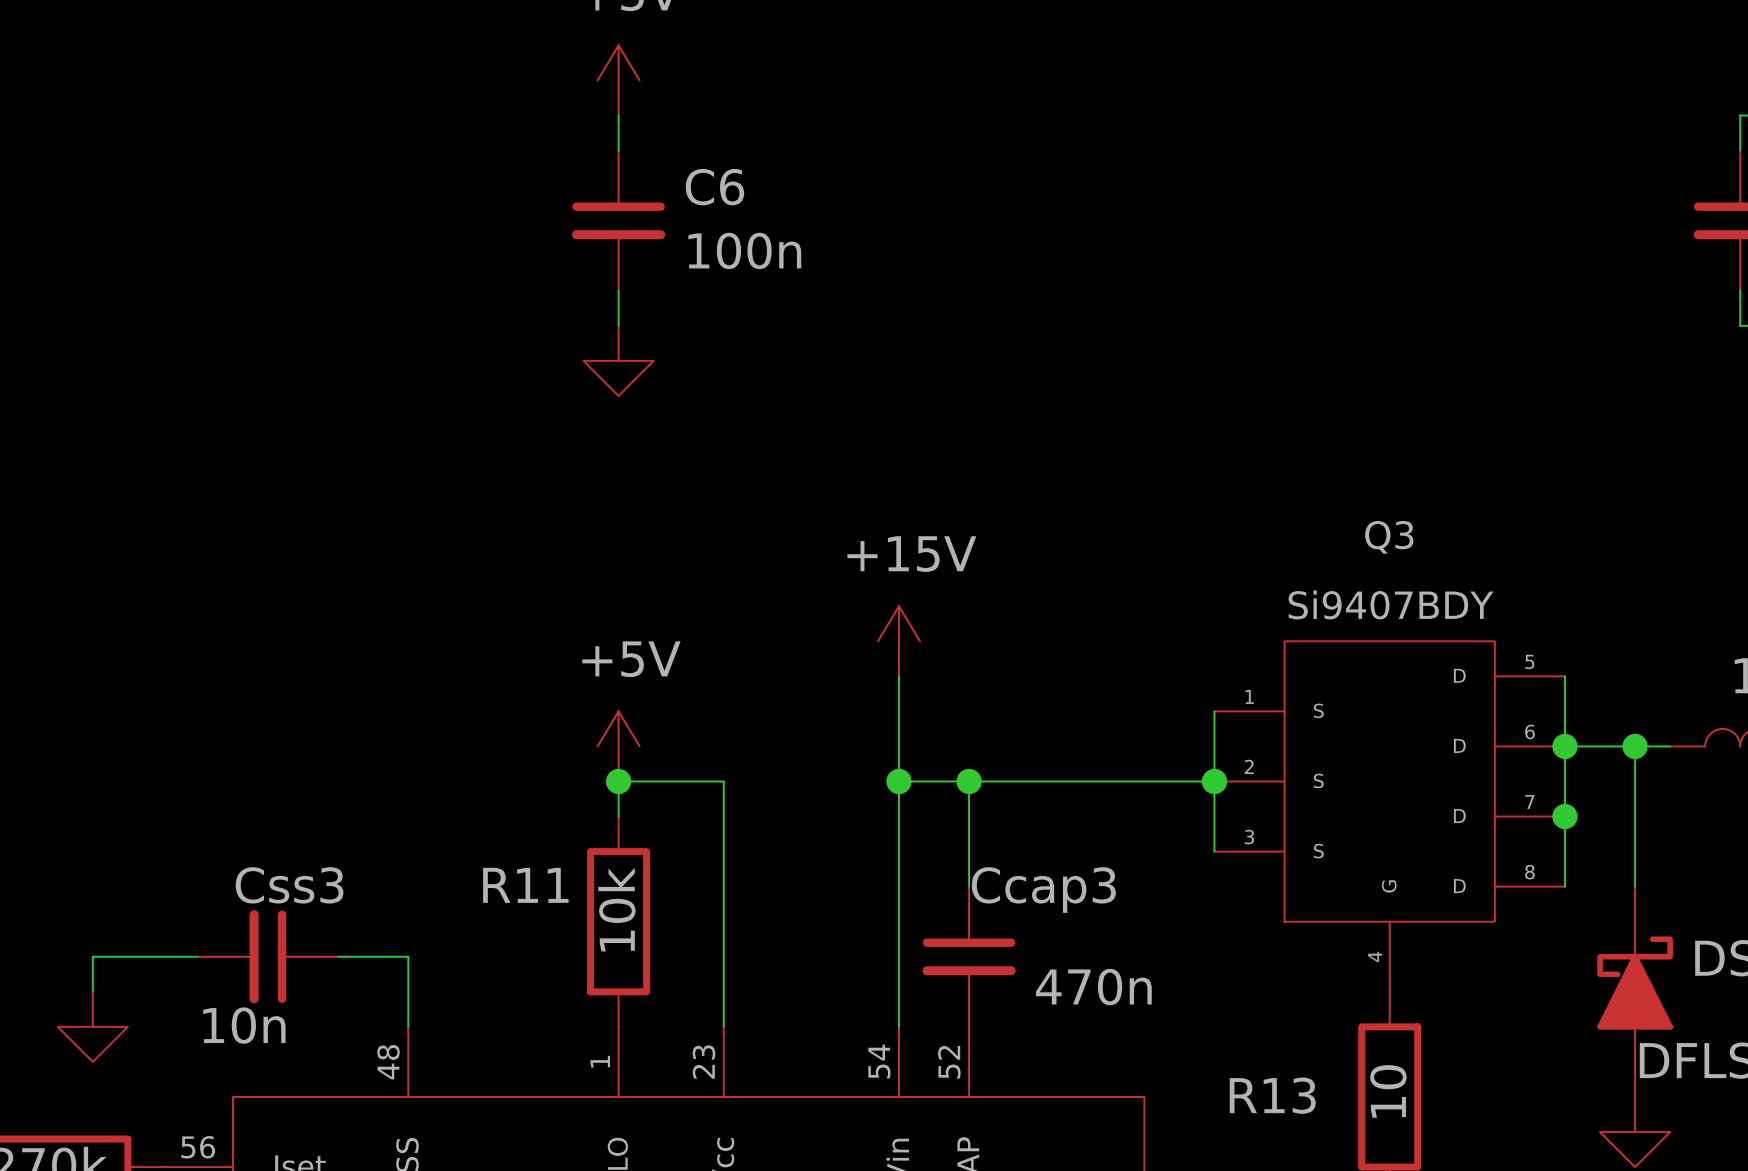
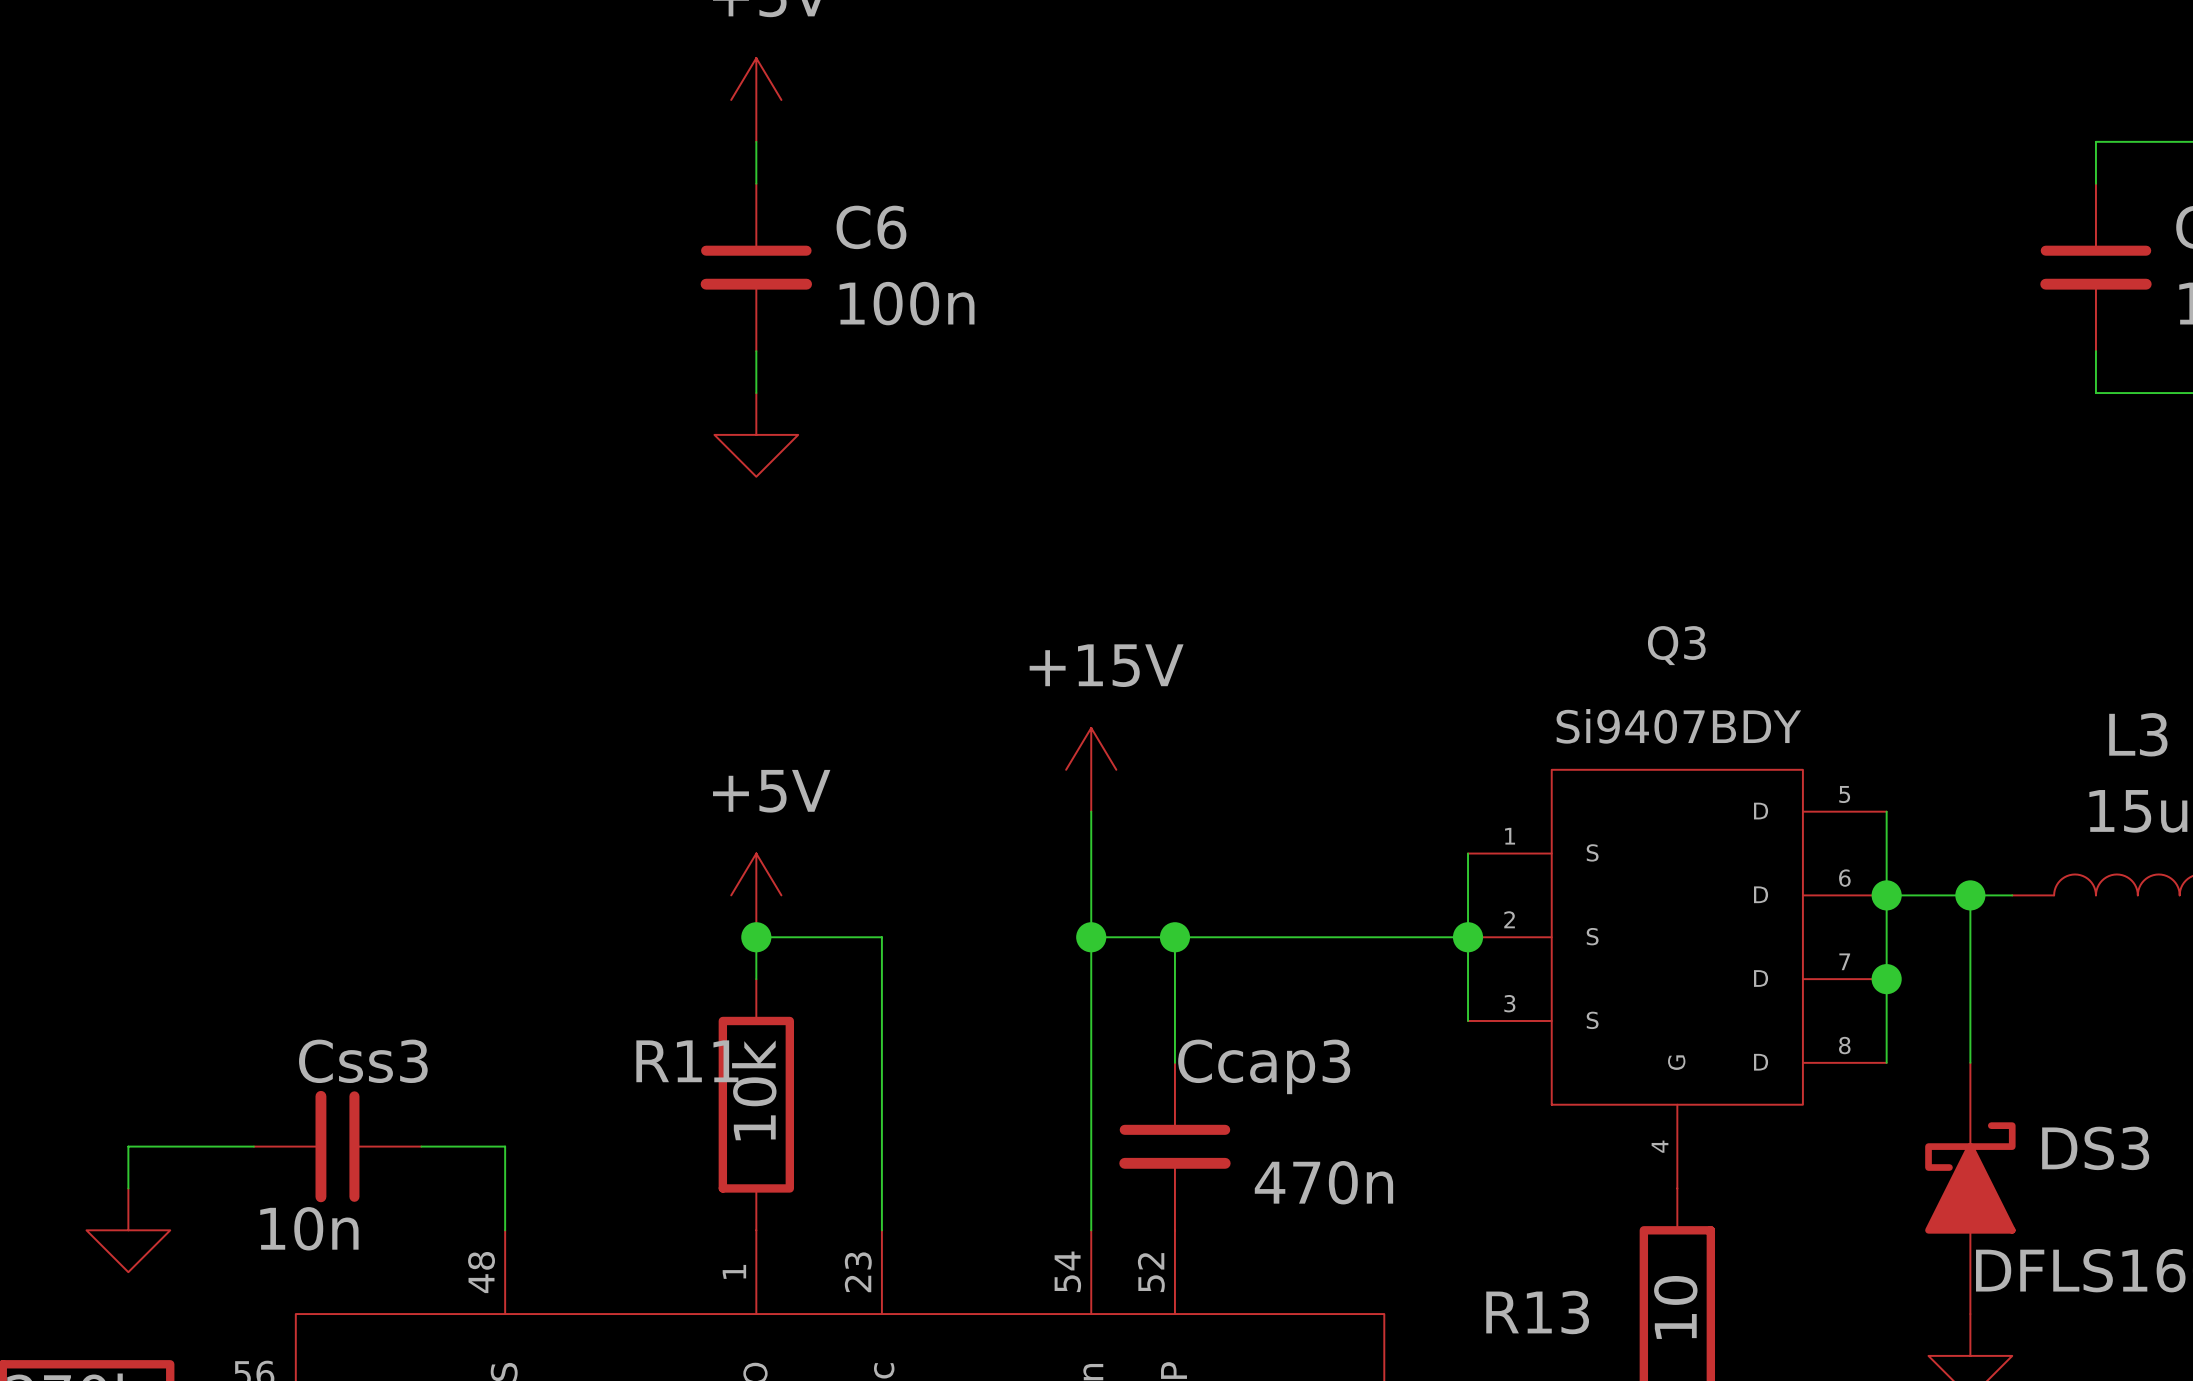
R11 name position: R11 (525, 885) -> R11 (687, 1061)

